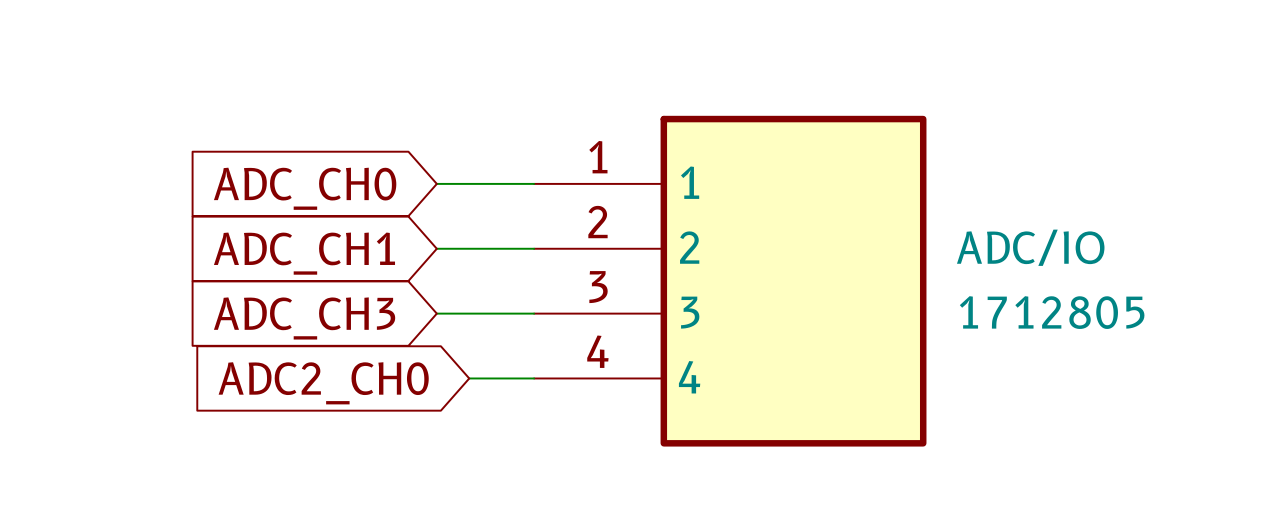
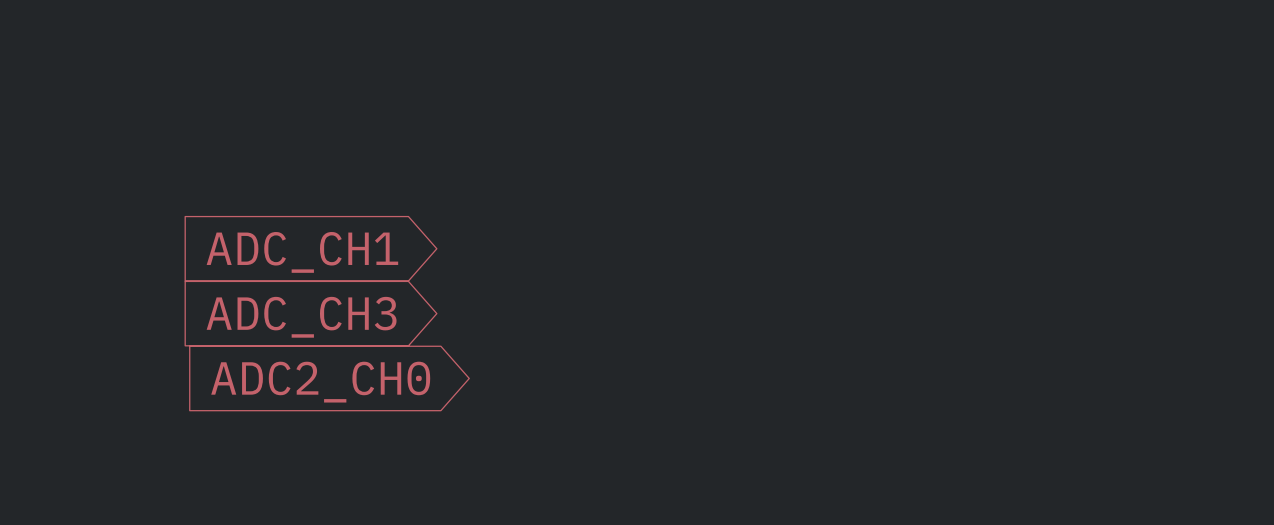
wire: (436, 183) (534, 183) -> none
global label: ADC_CH0 (305, 188) -> none
wire: (436, 248) (534, 248) -> none
ADC/IO: 1712805 (730, 281) -> none
wire: (436, 313) (534, 313) -> none
wire: (469, 378) (534, 378) -> none

